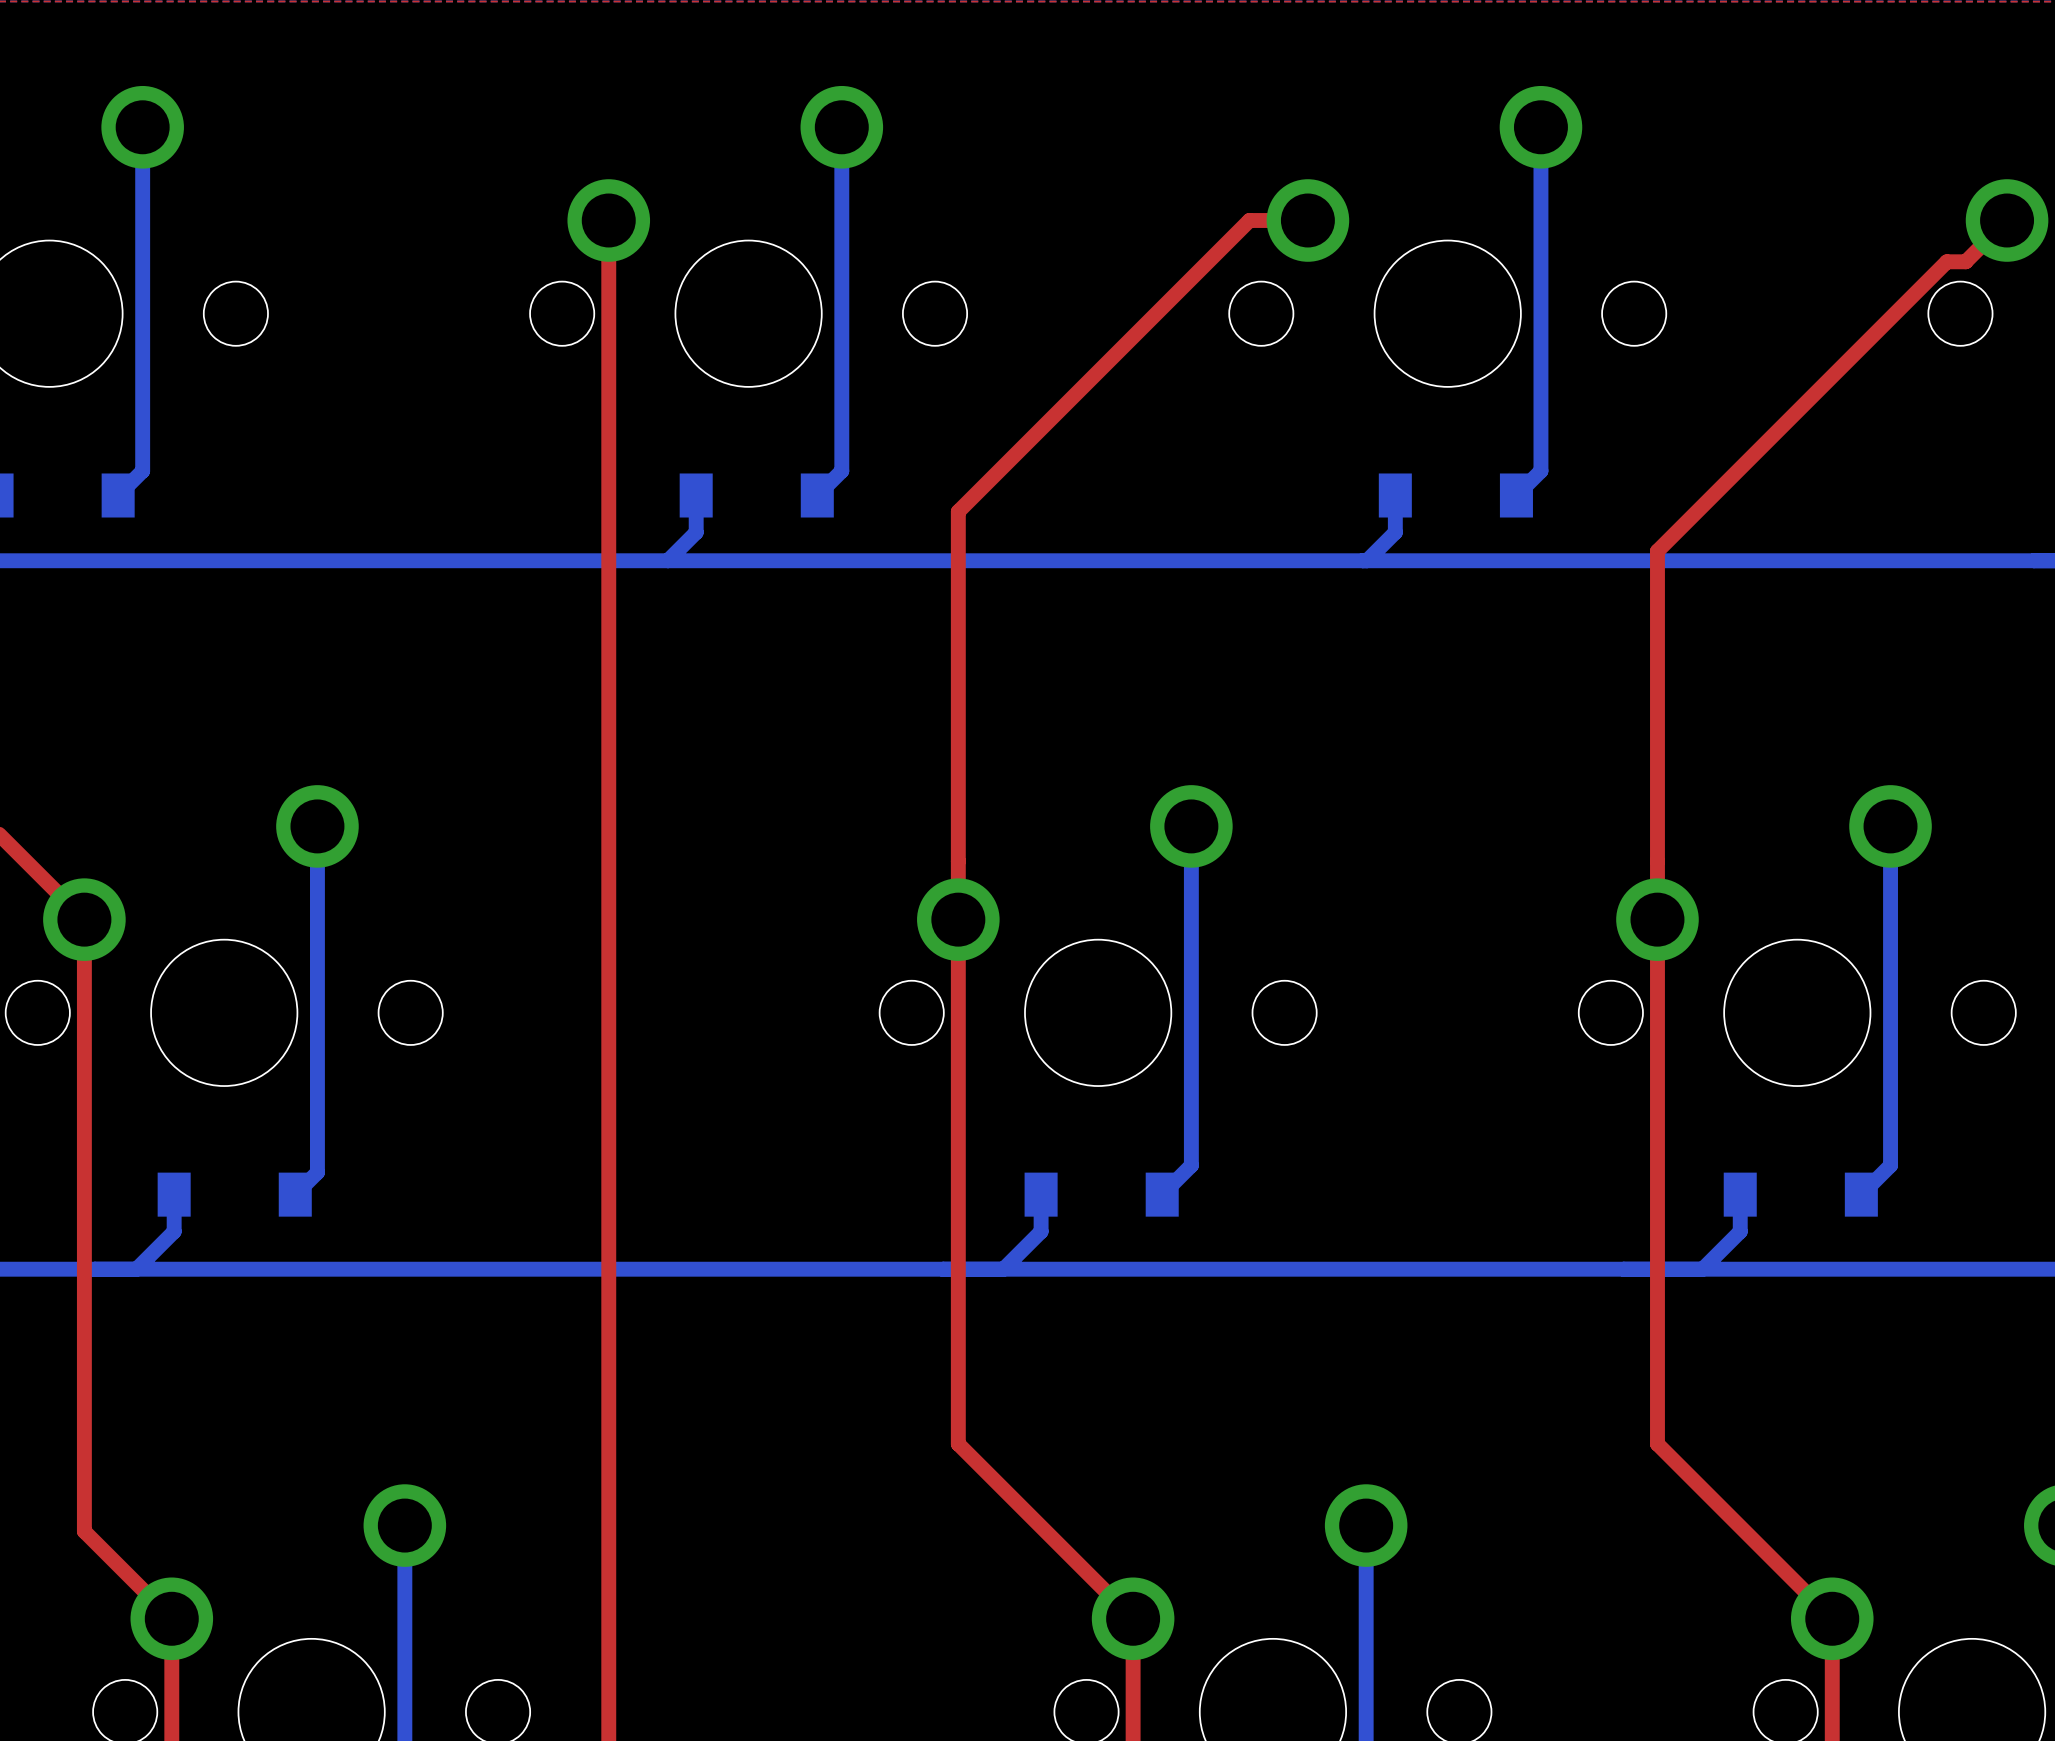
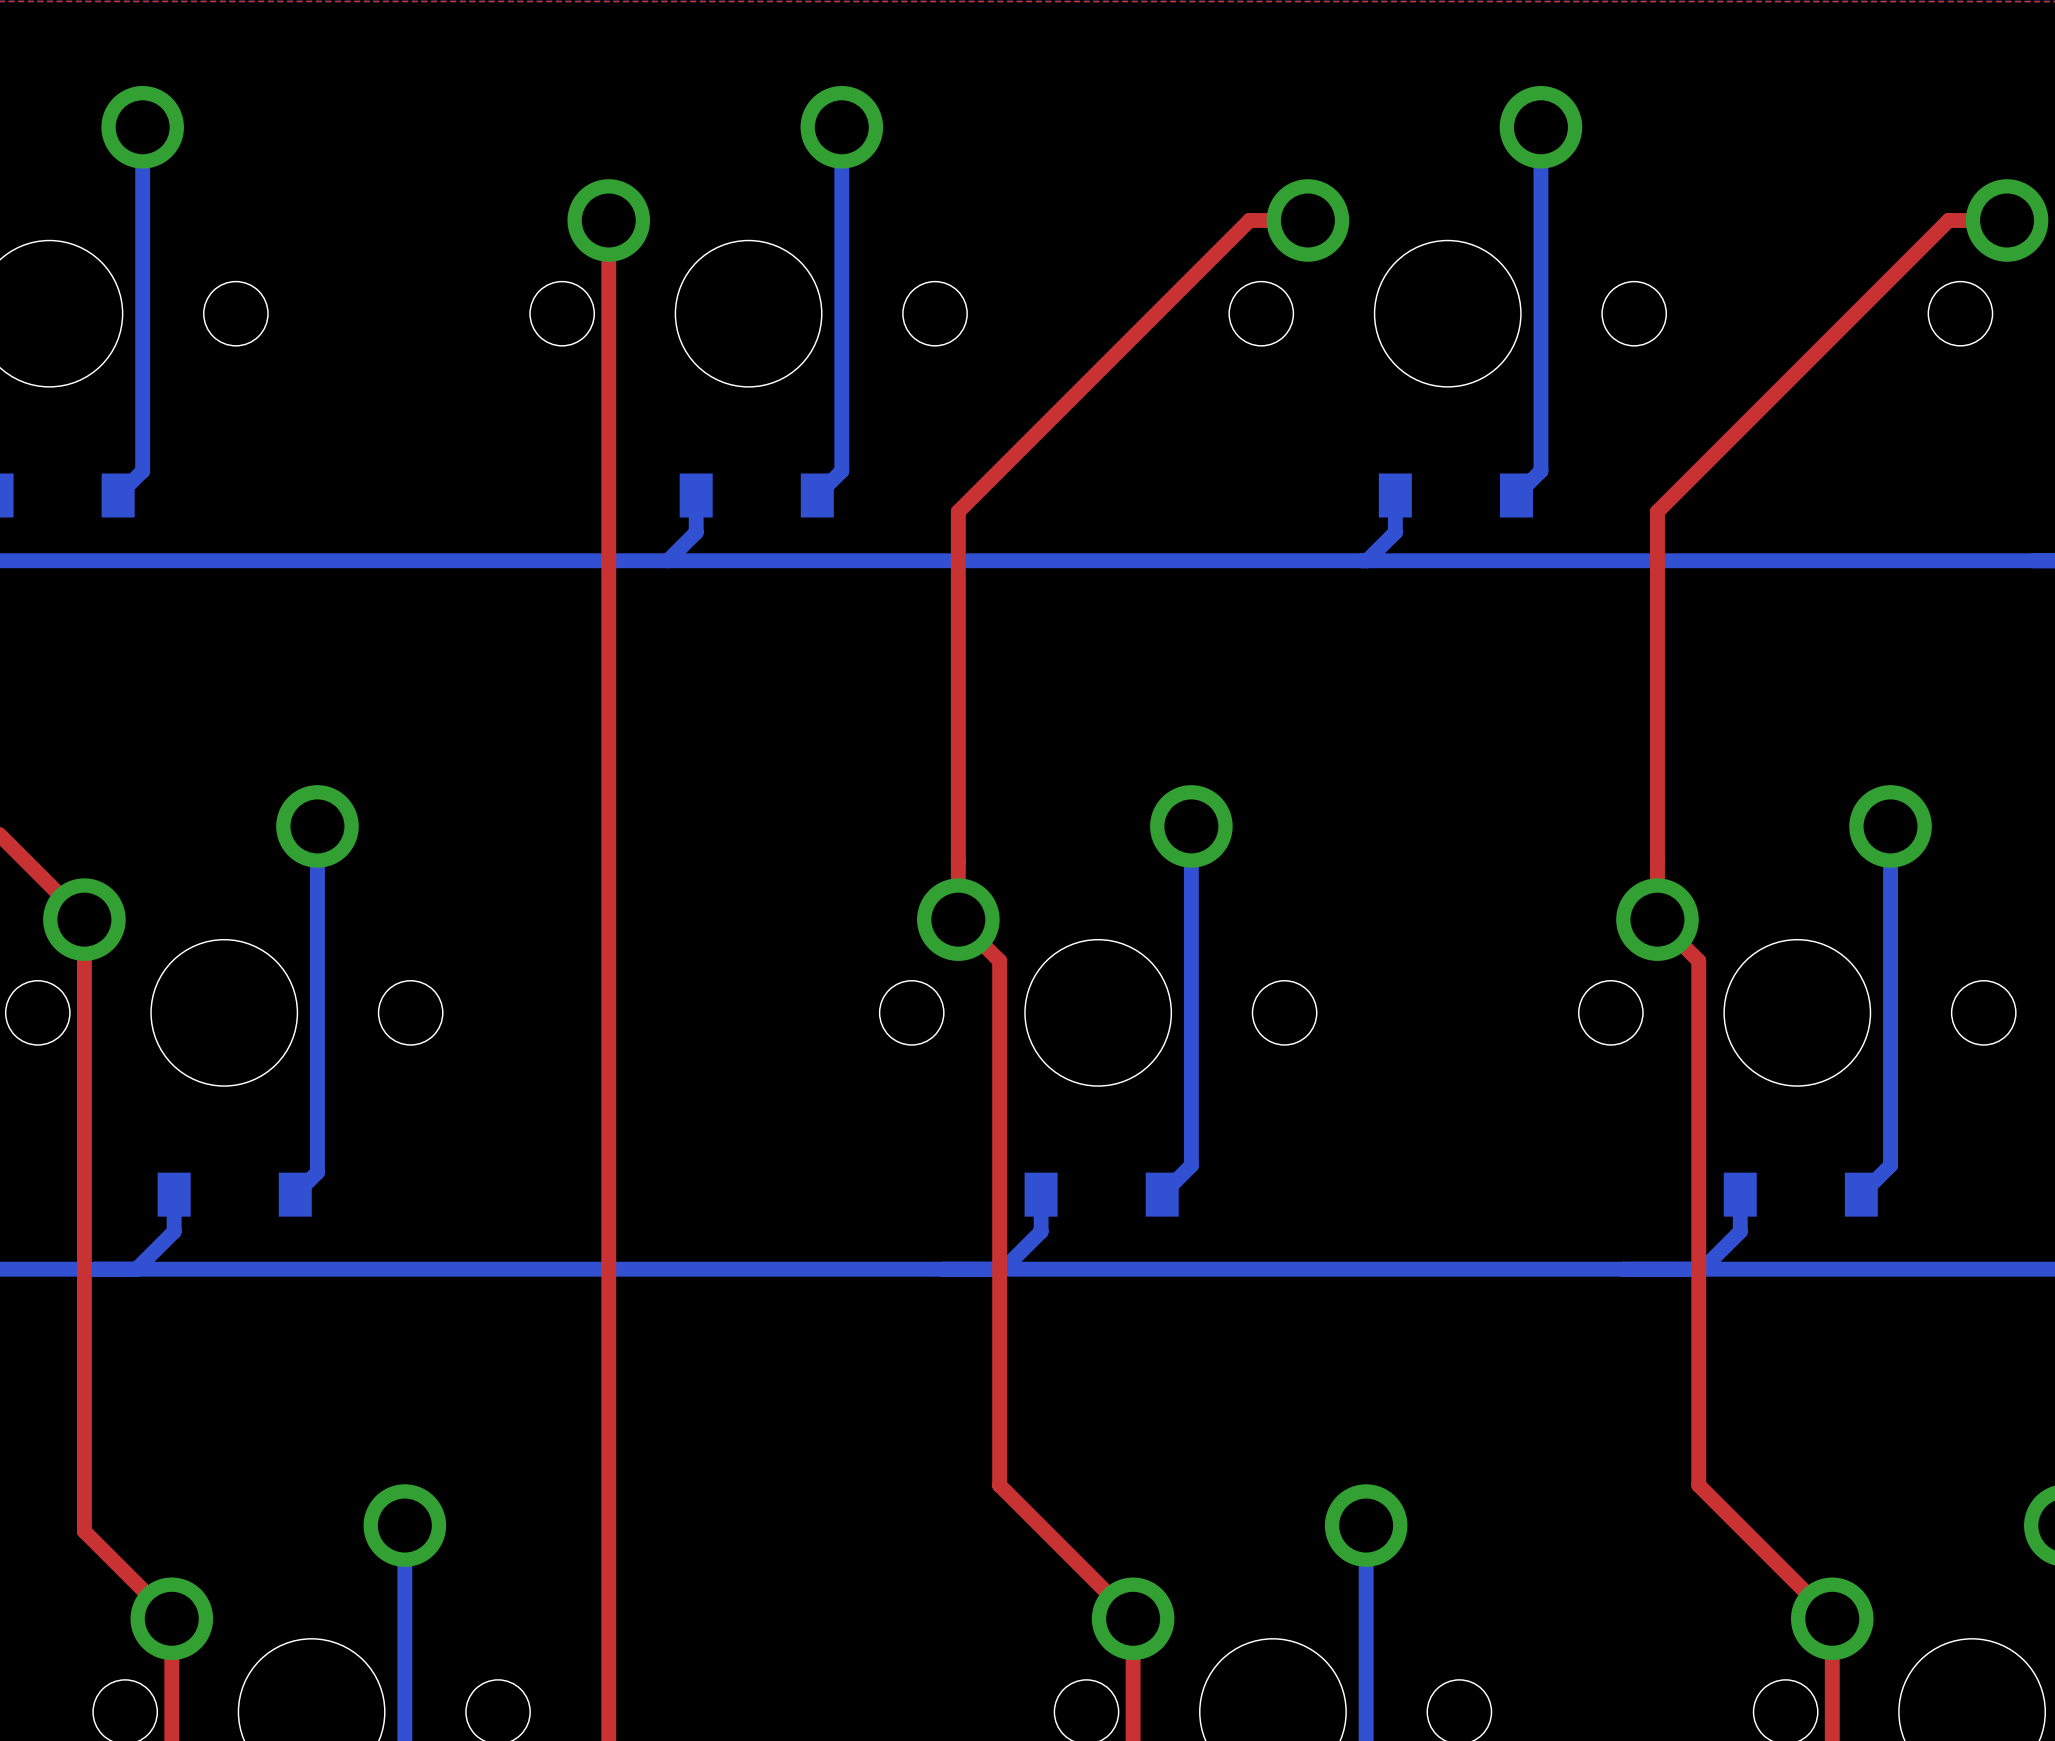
top track: (2007, 220) (1965, 261) (1946, 261) (1657, 551) -> (2007, 220) (1948, 220) (1657, 511) (1657, 551)
top track: (958, 919) (958, 1444) (999, 1485) -> (958, 919) (999, 960) (999, 1485)
top track: (1657, 919) (1657, 1444) (1698, 1485) -> (1657, 919) (1698, 960) (1698, 1485)

